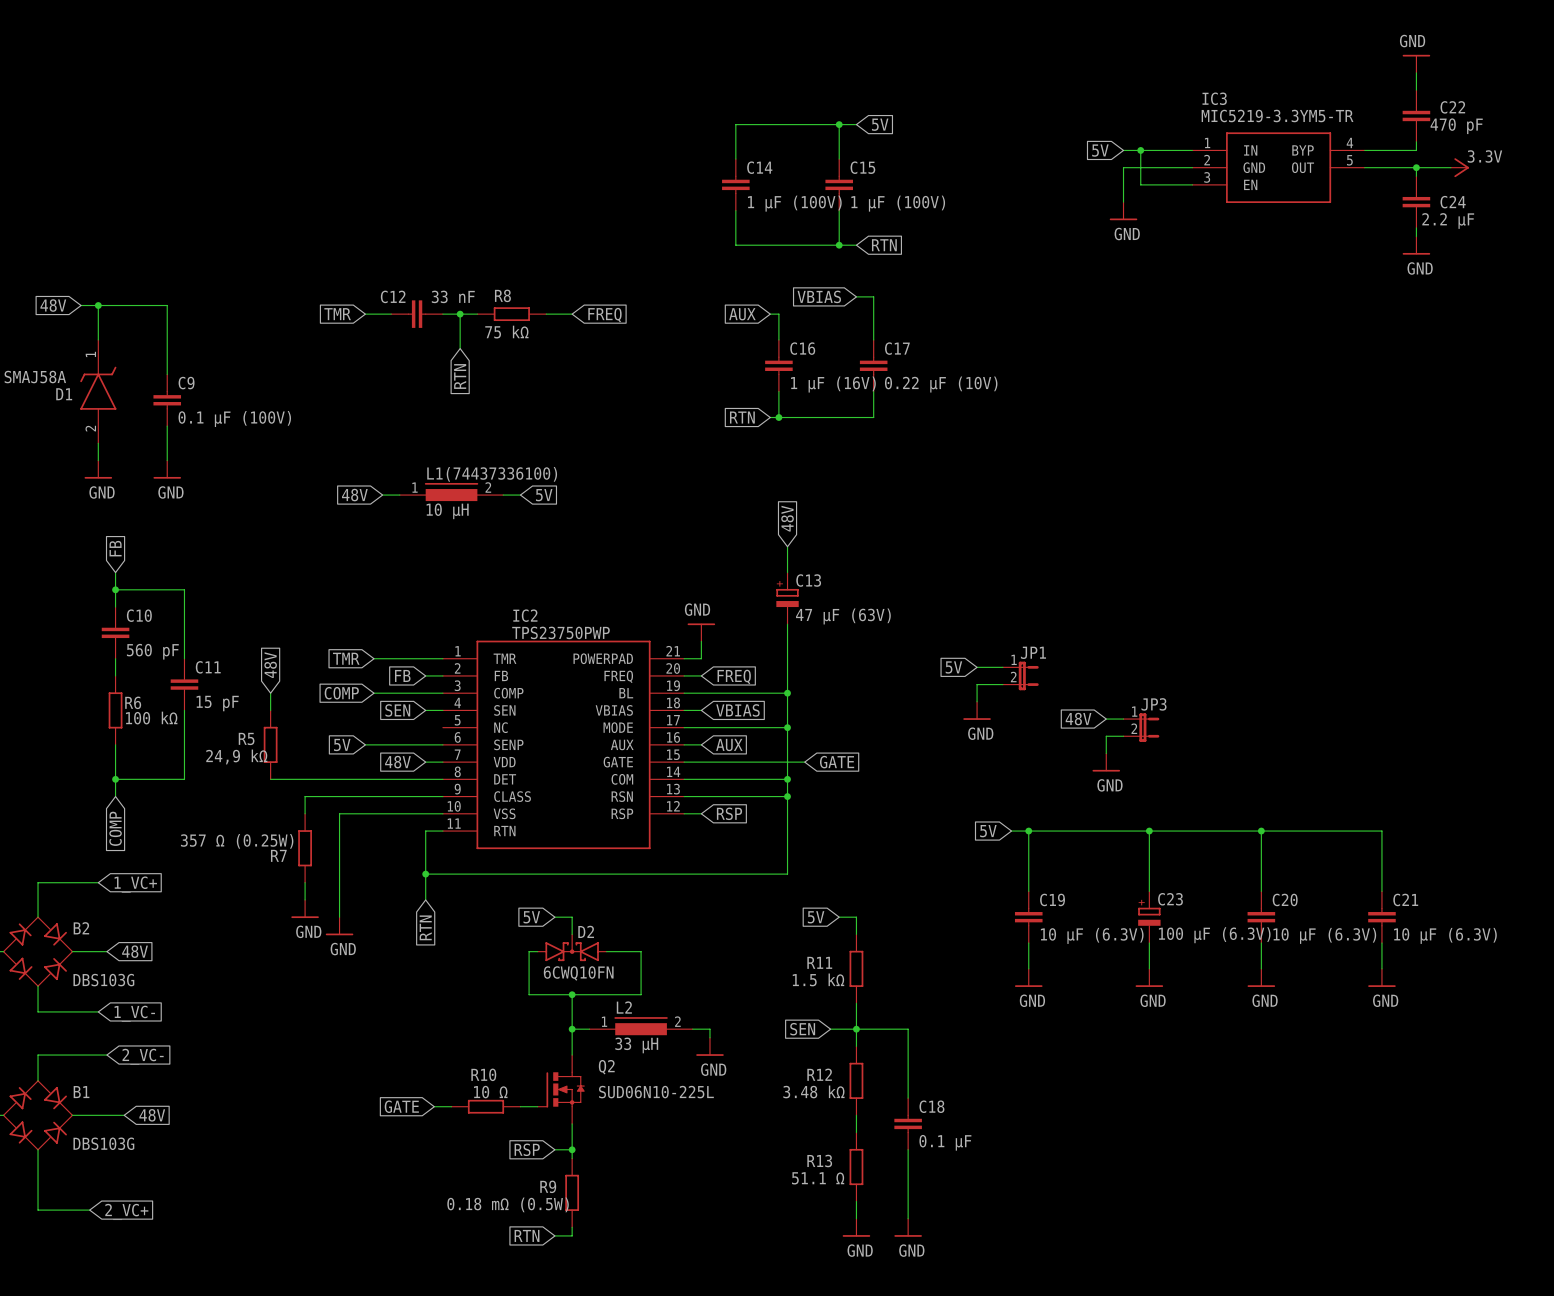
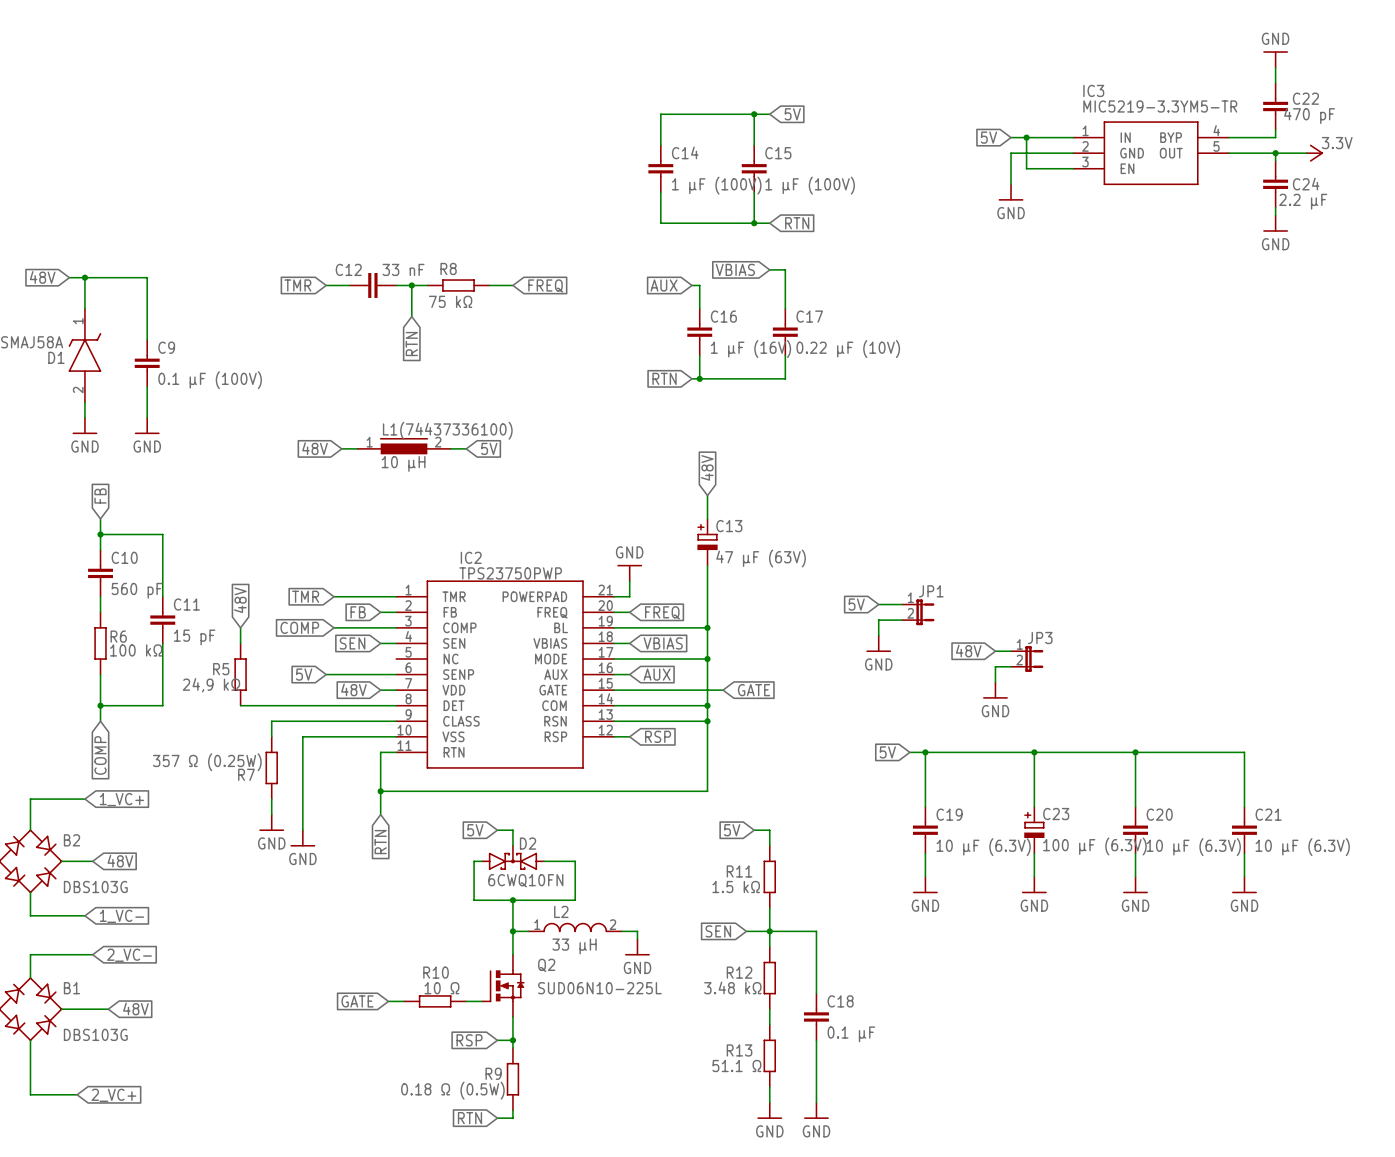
L2 symbol: [589, 1017, 693, 1036] -> [528, 922, 622, 933]
R9 value: 0.18 mΩ (0.5W) (508, 1204) -> 0.18 Ω (0.5W) (452, 1090)

